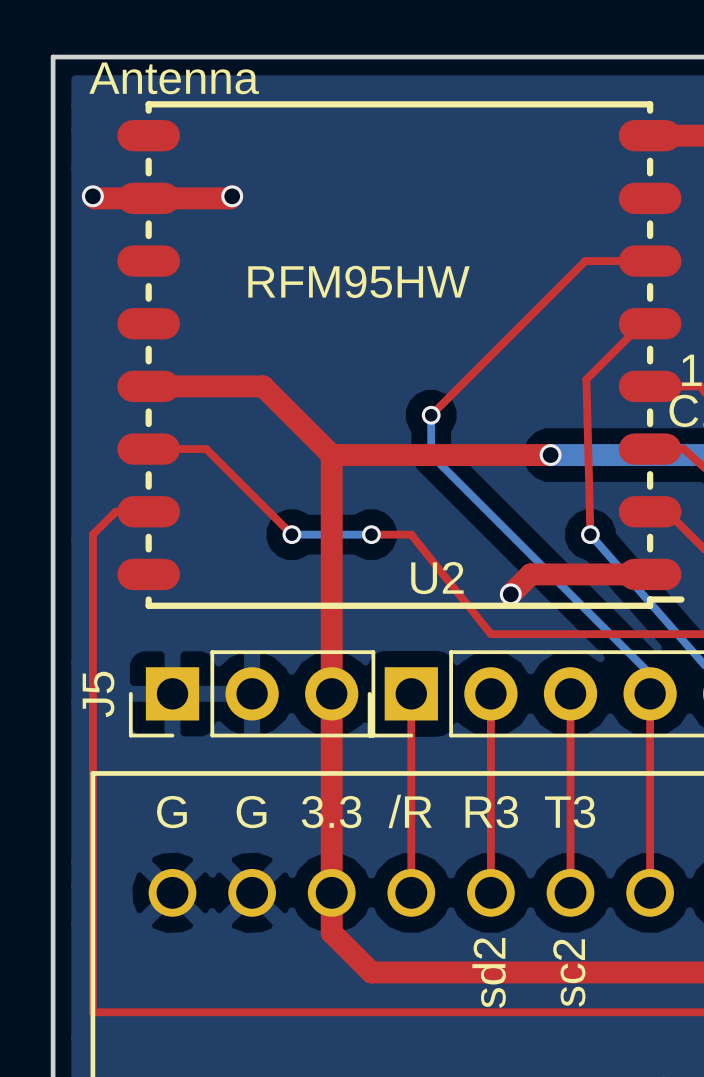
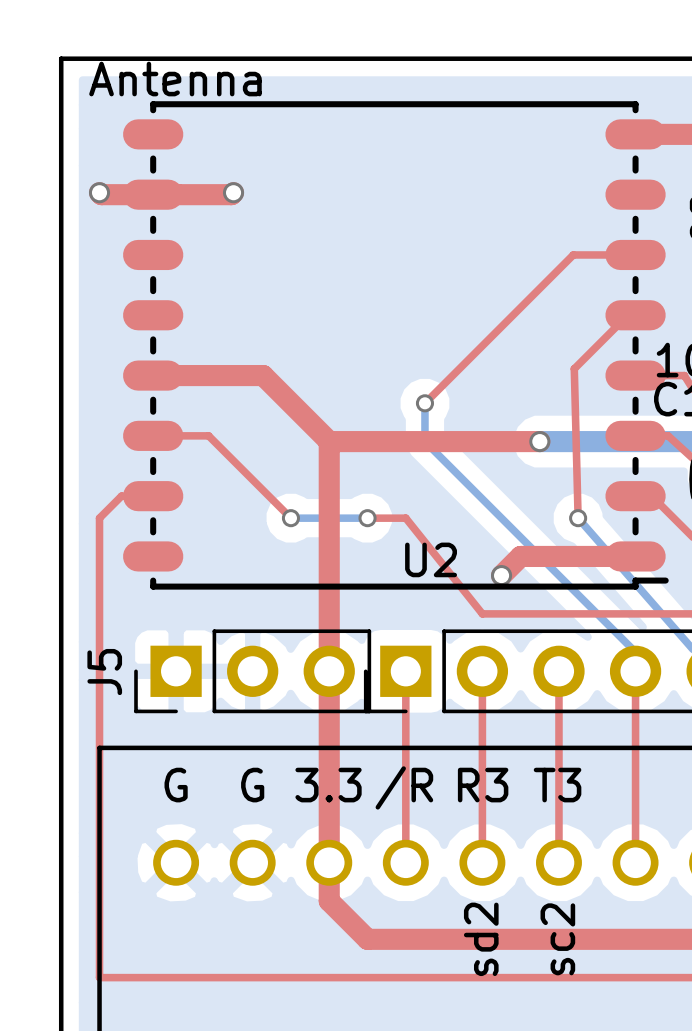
U2 value: RFM95HW (358, 281) -> none

